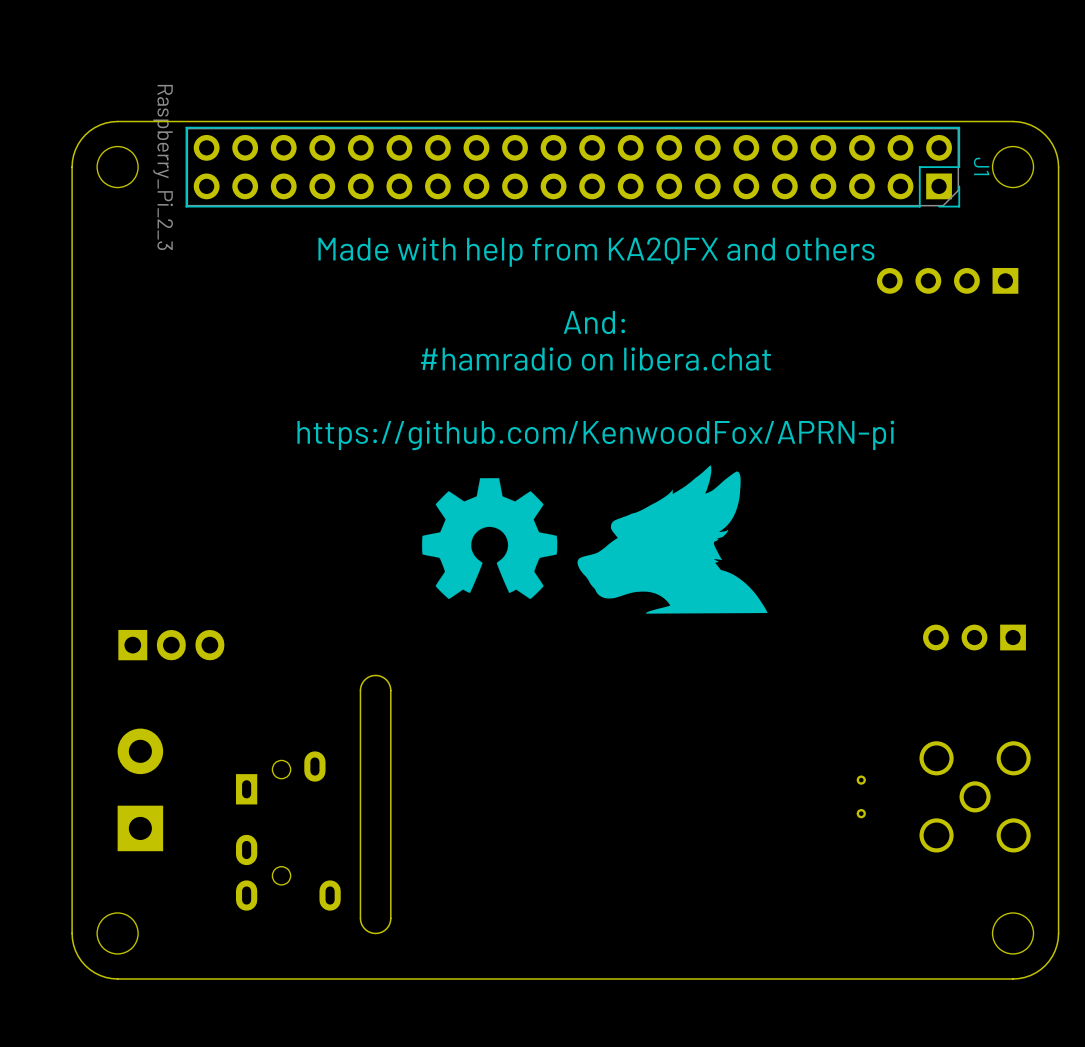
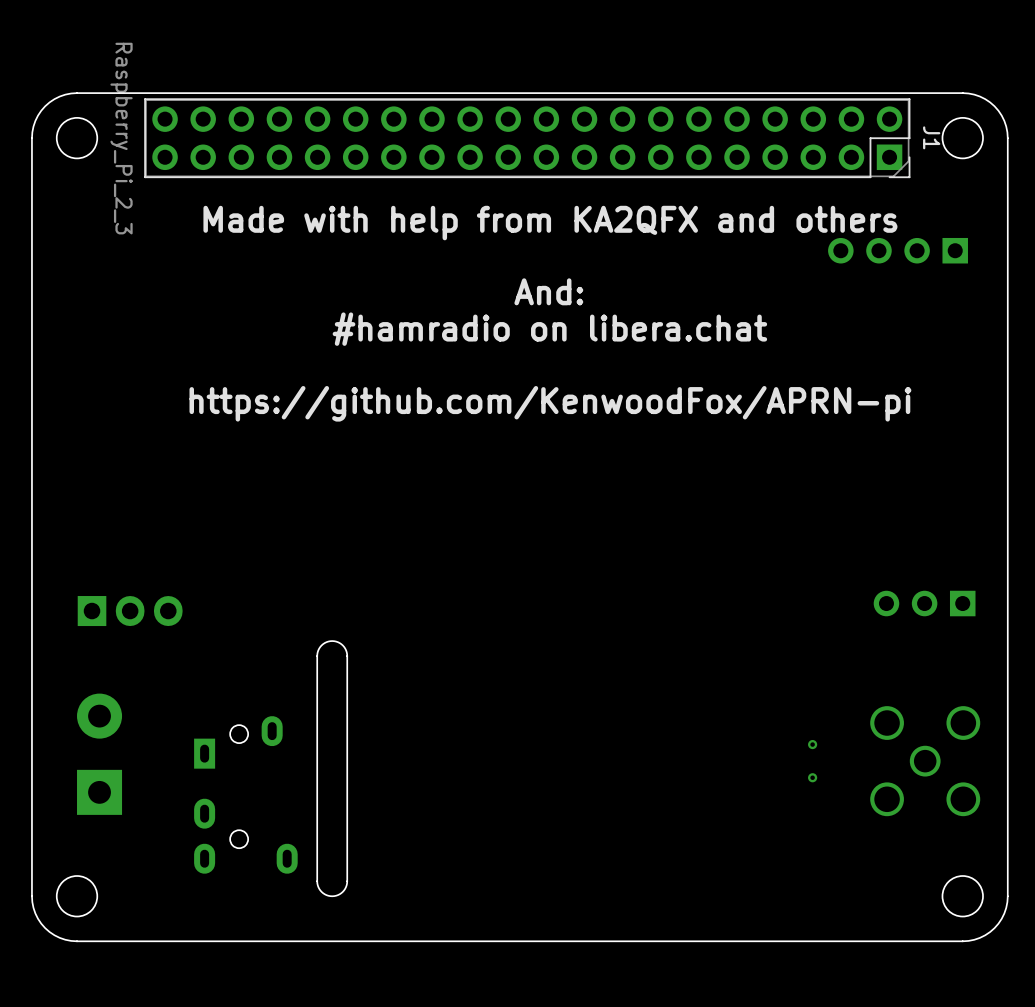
drawing: [422, 478, 558, 600] -> none
part: (672, 539) -> none

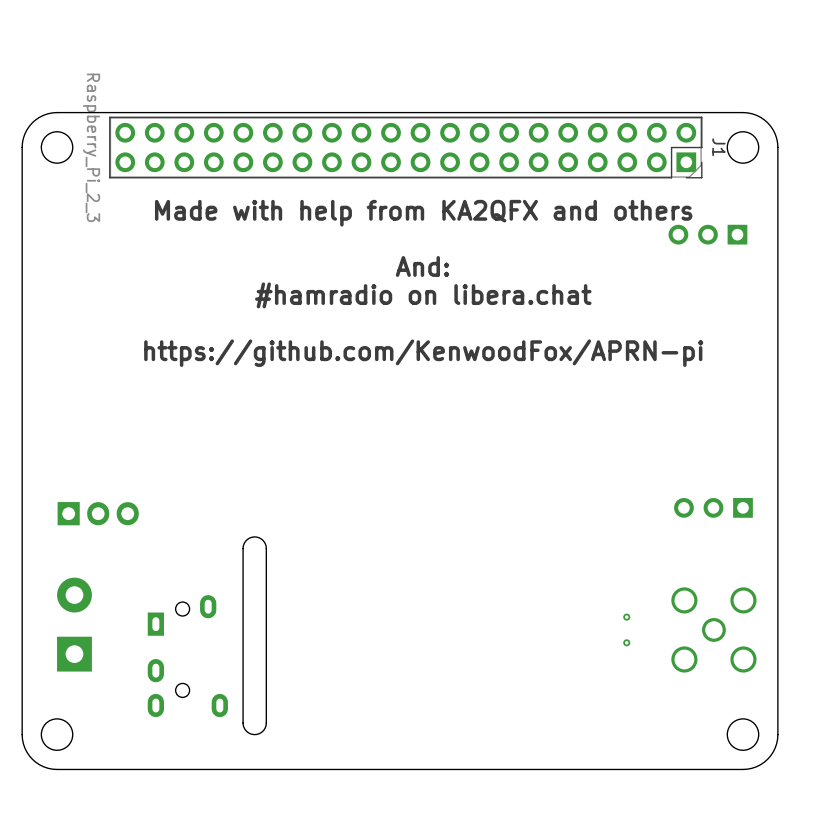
part: (898, 250) -> none
part: none -> (707, 234)

